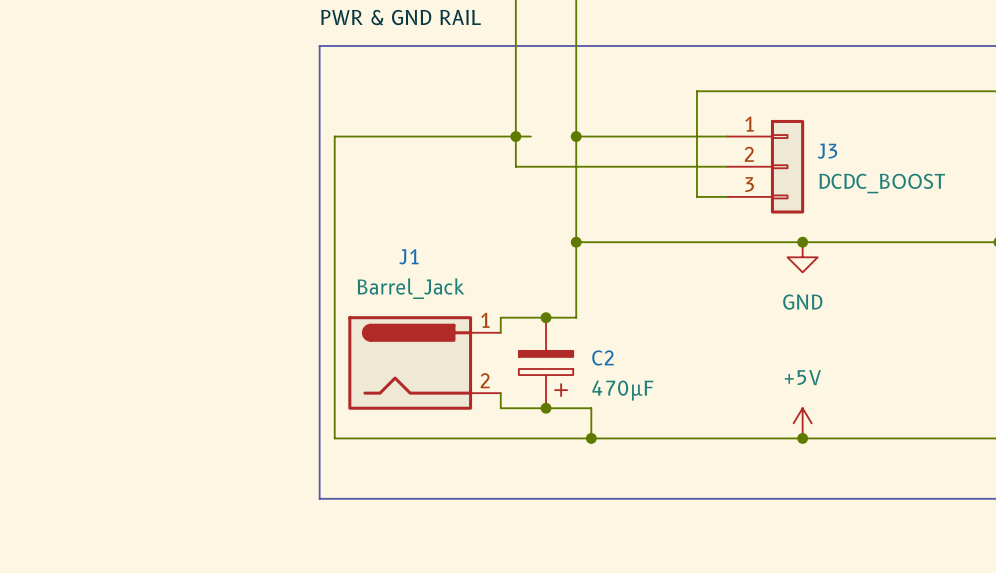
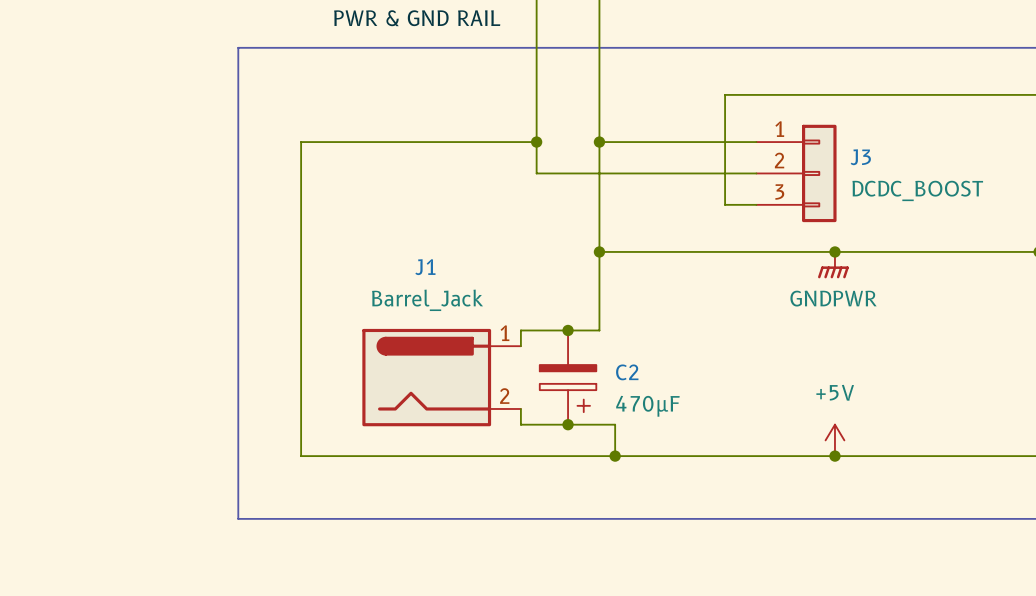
line: (319, 45) (319, 498) -> (332, 47) (238, 47) (238, 518) (332, 518)
wire: (334, 136) (334, 438) -> (348, 142) (301, 142) (301, 456) (348, 456)
wire: (515, 136) (530, 136) -> none
power symbol: GND (802, 257) -> GNDPWR (833, 265)

